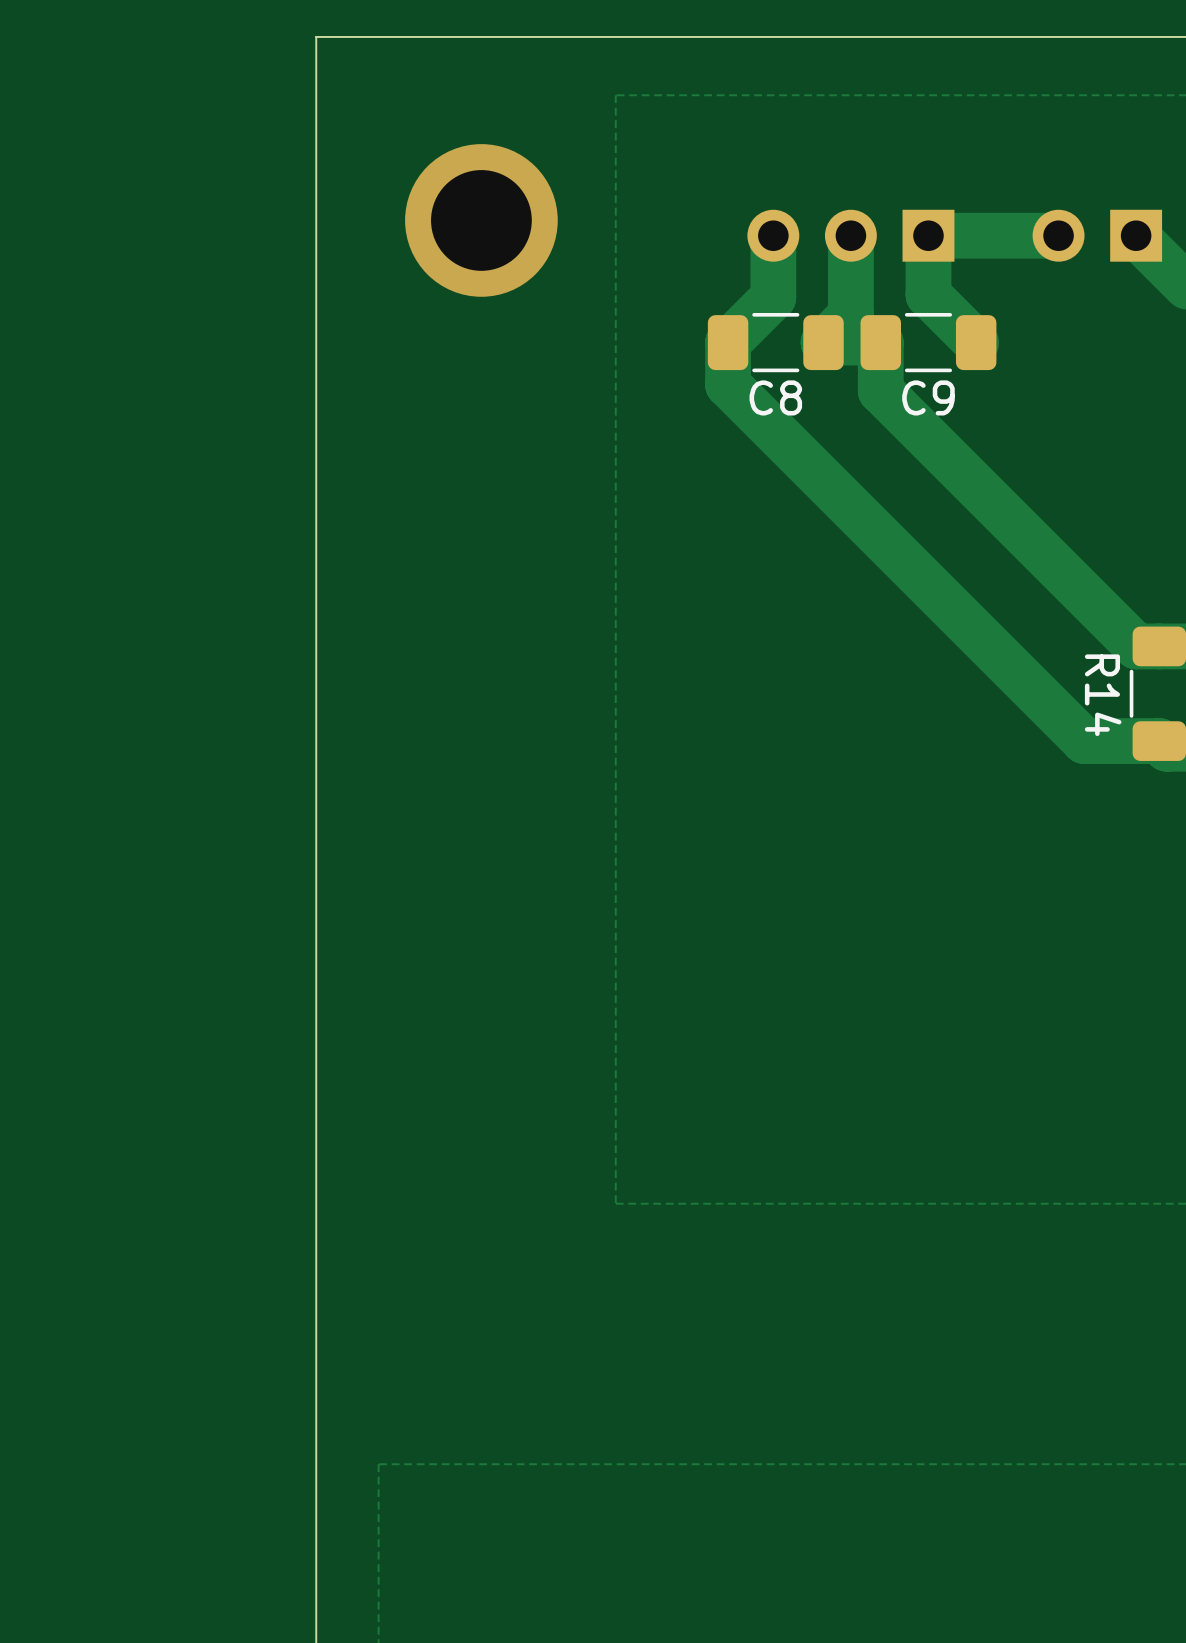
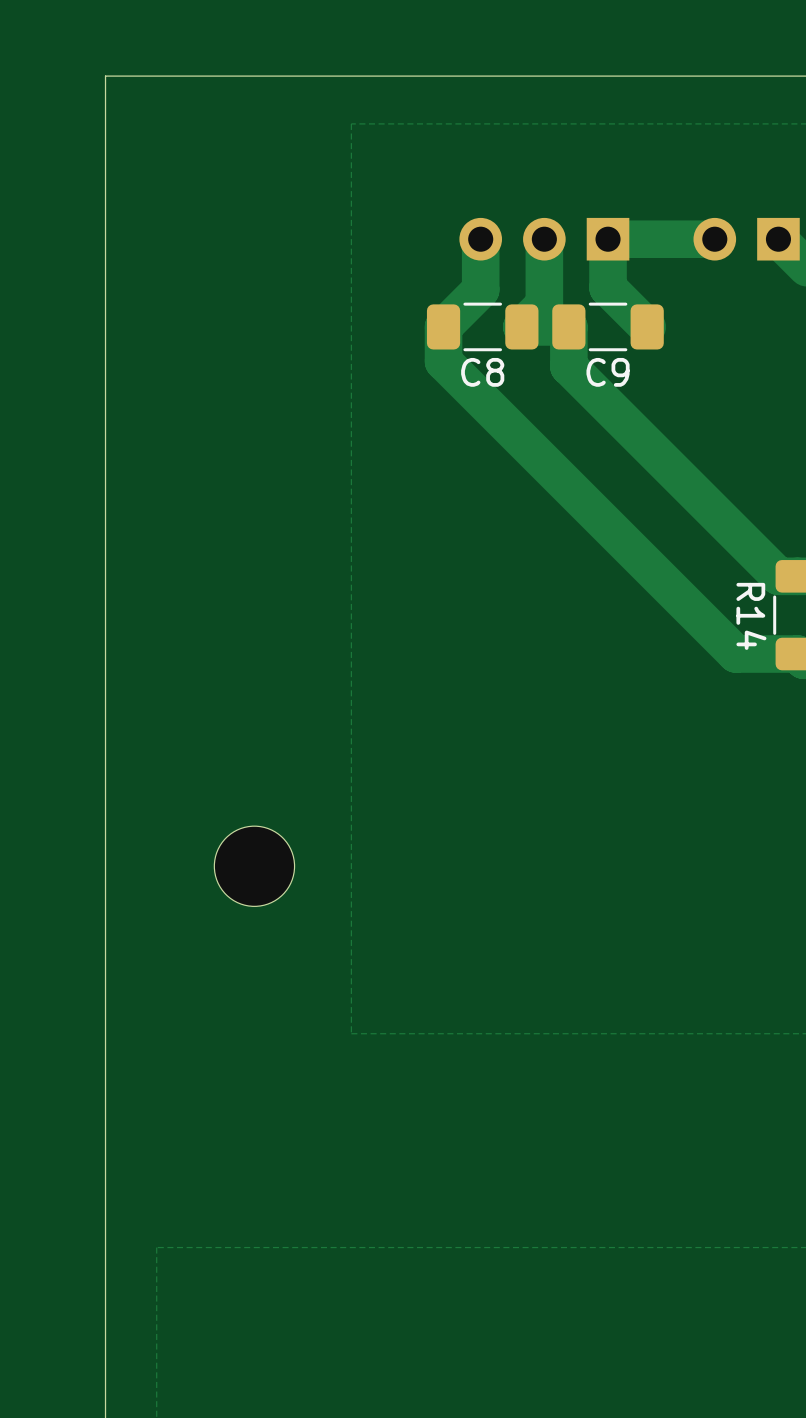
via: (481, 220) -> none
part: none -> (254, 866)

